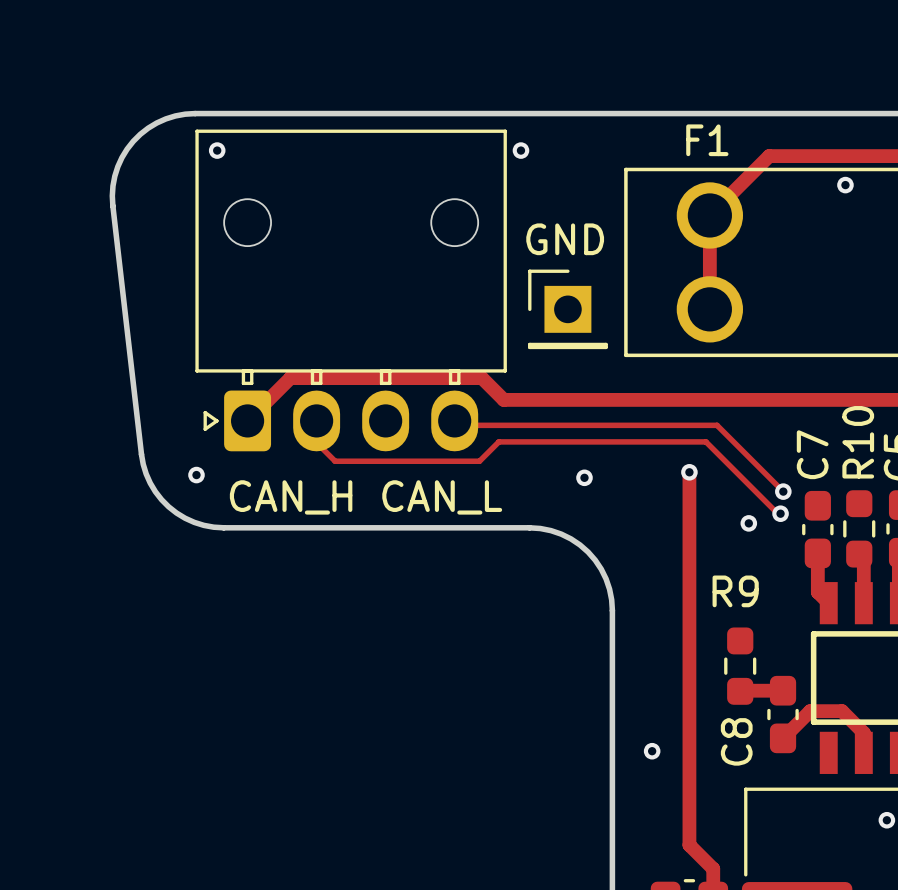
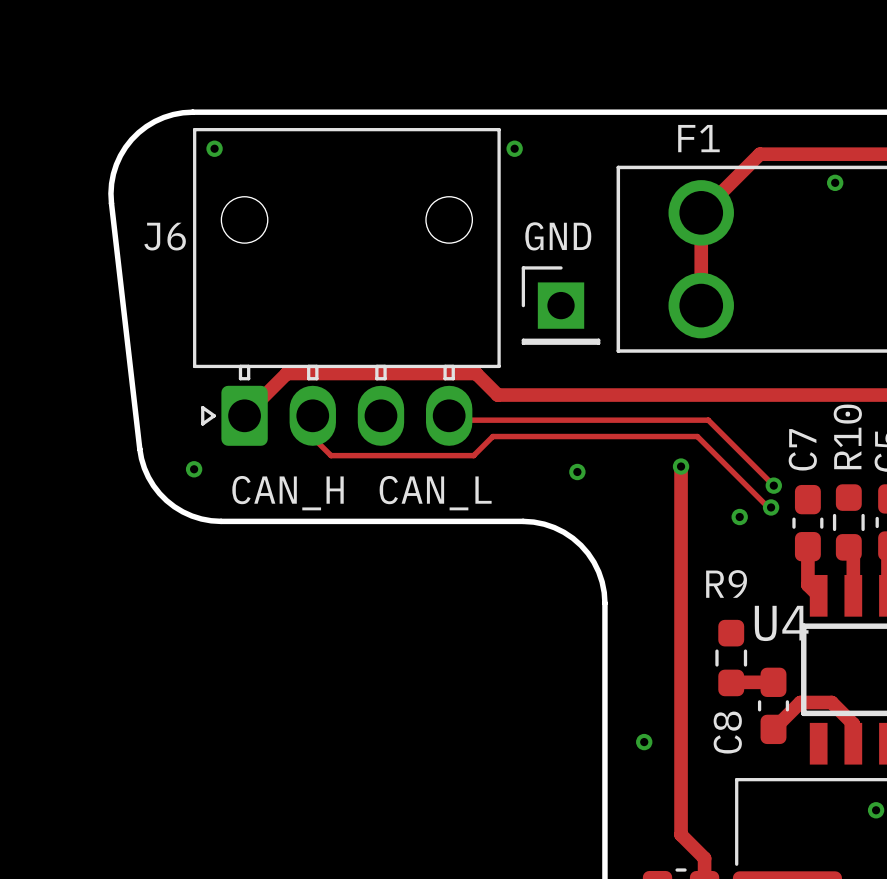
J6 name: none -> J6 (165, 236)
U4 name: none -> U4 (781, 623)

